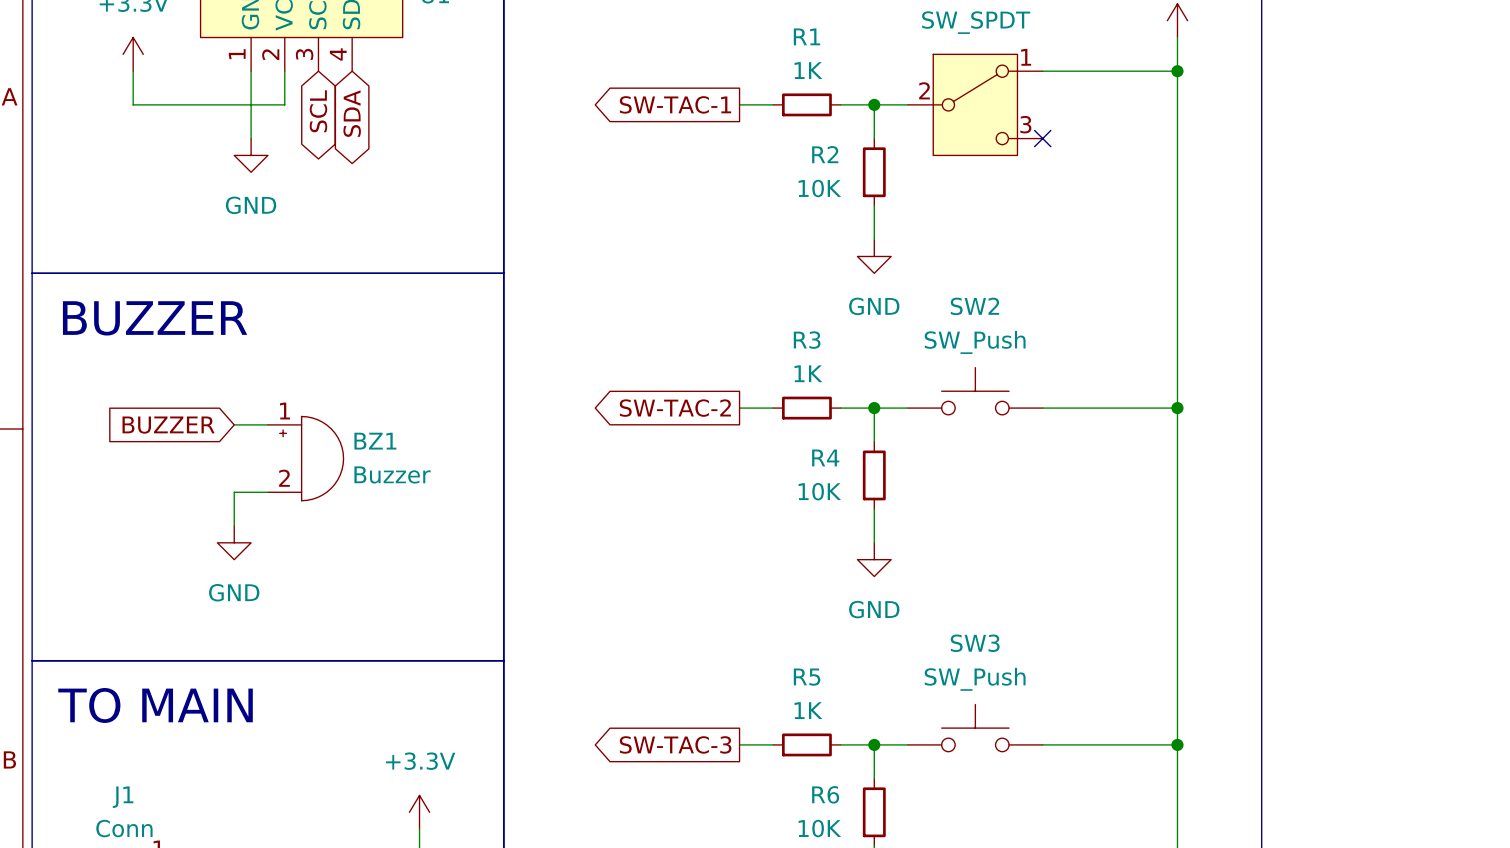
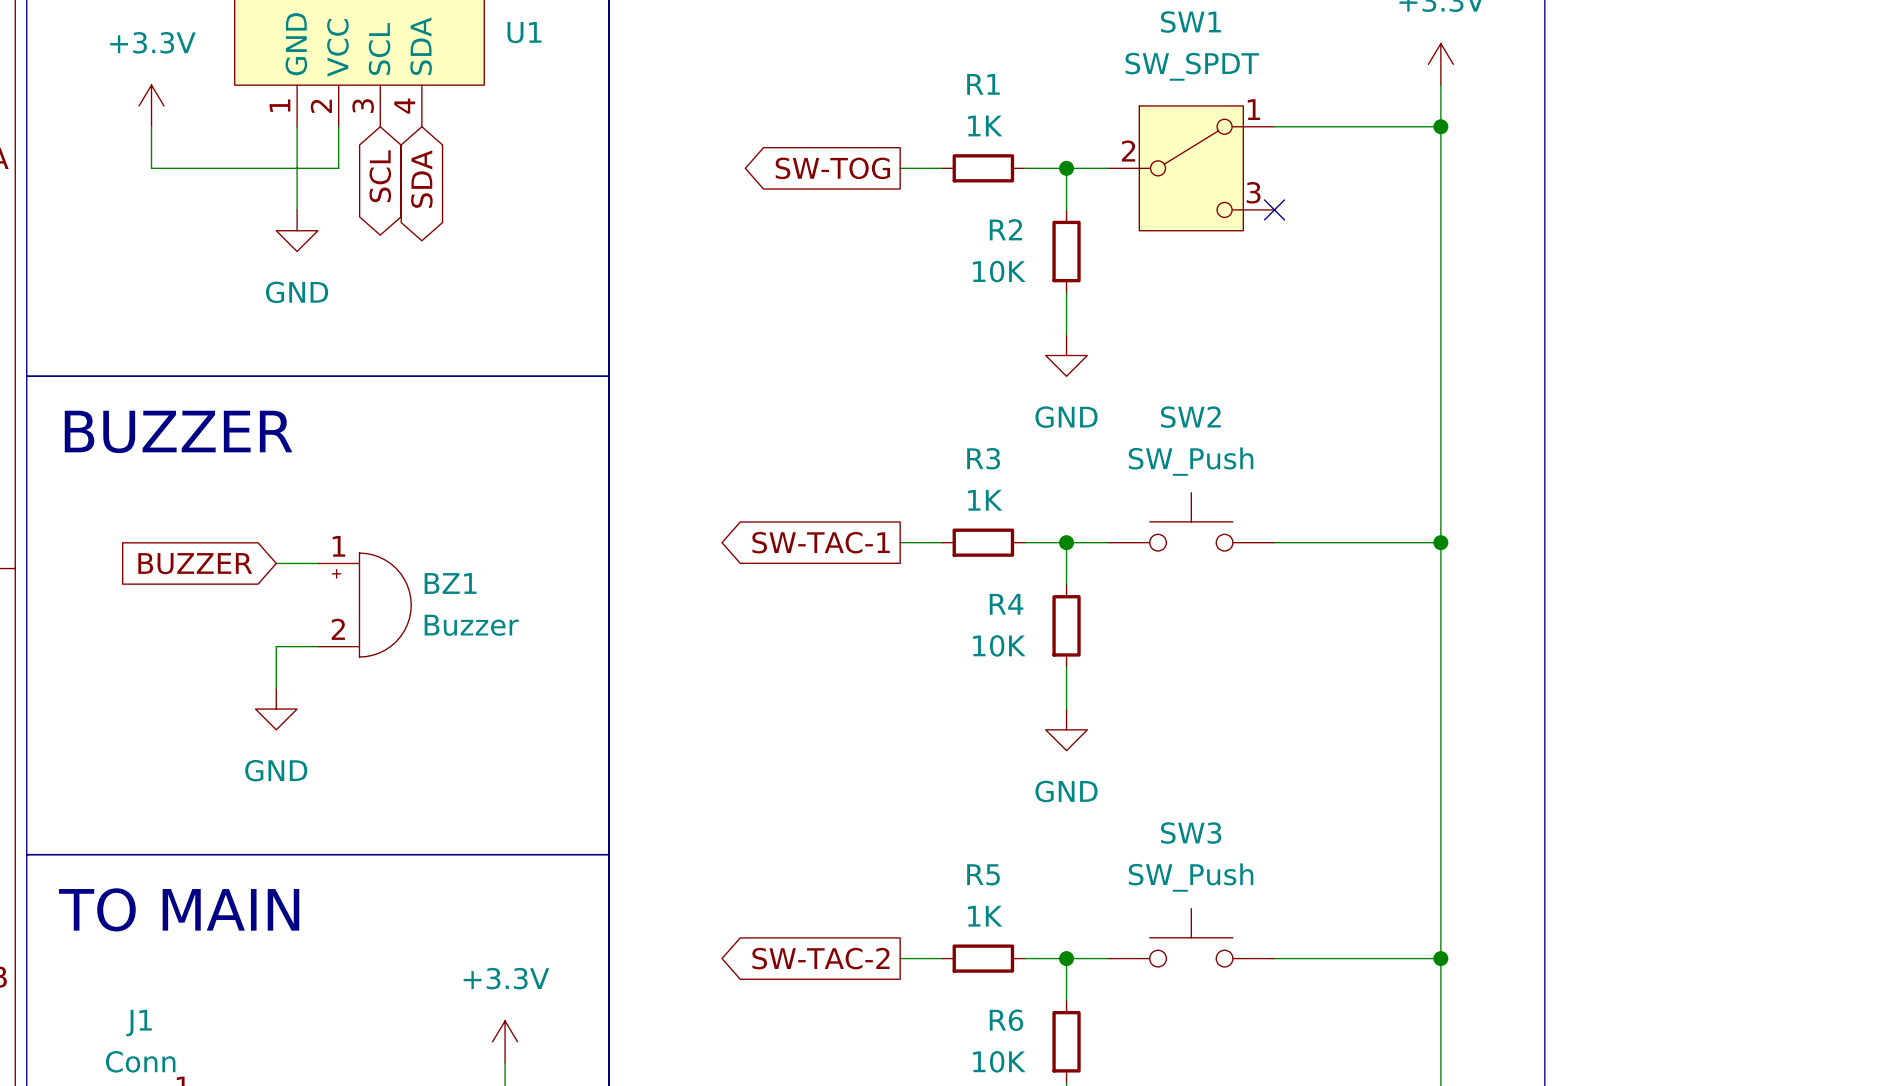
global label: SW-TAC-1 (675, 104) -> SW-TOG (832, 168)
global label: SW-TAC-2 (675, 408) -> SW-TAC-1 (821, 542)
global label: SW-TAC-3 (675, 744) -> SW-TAC-2 (820, 958)

